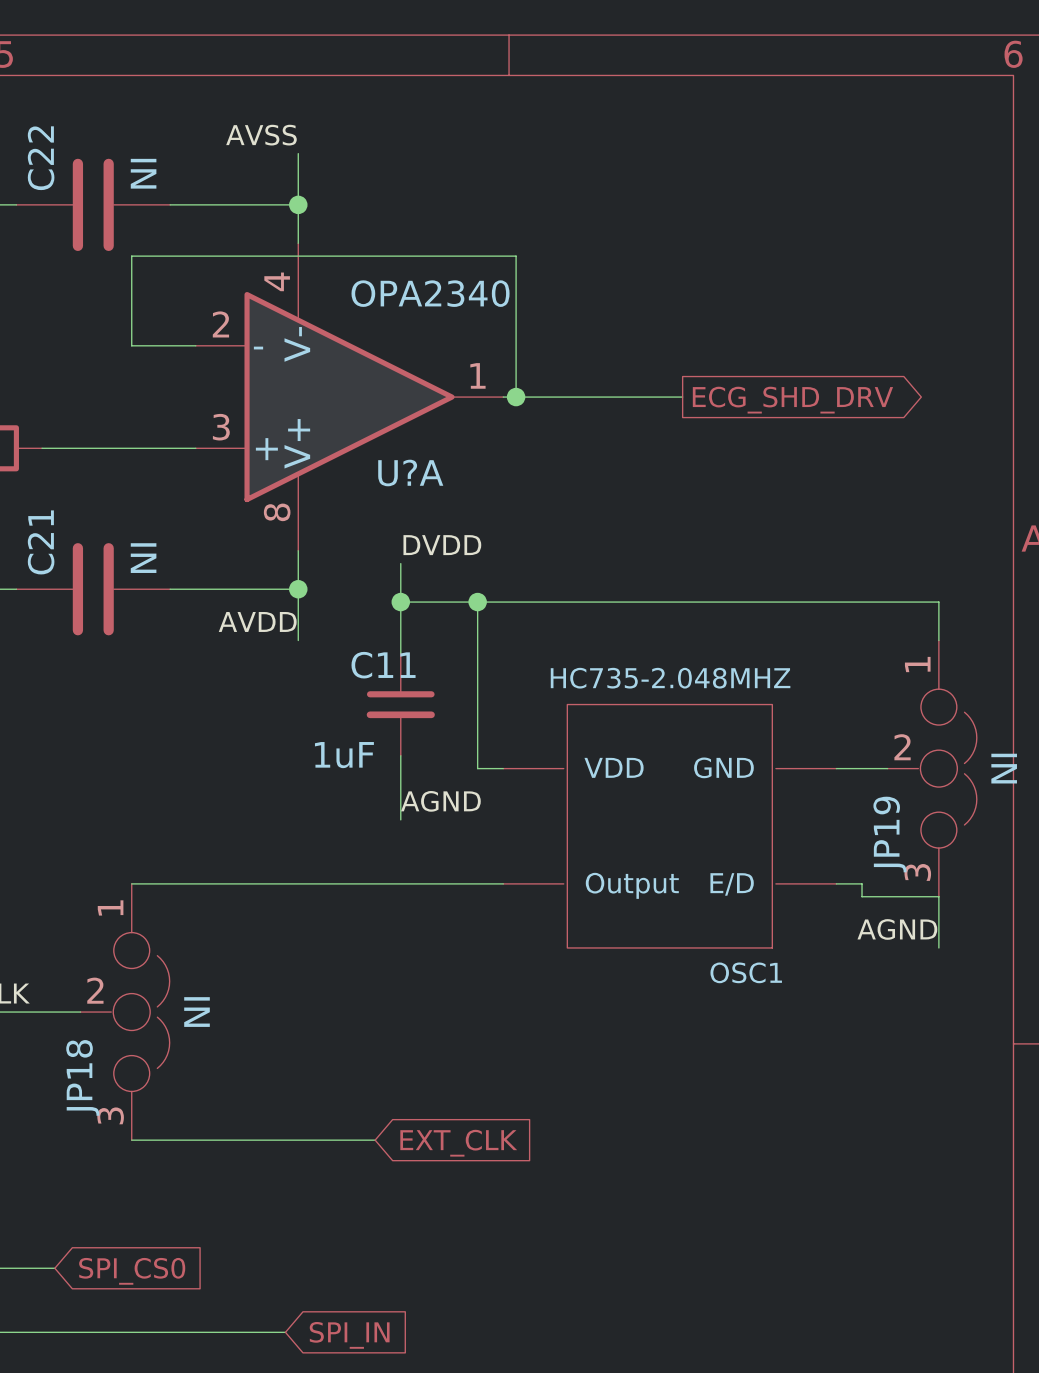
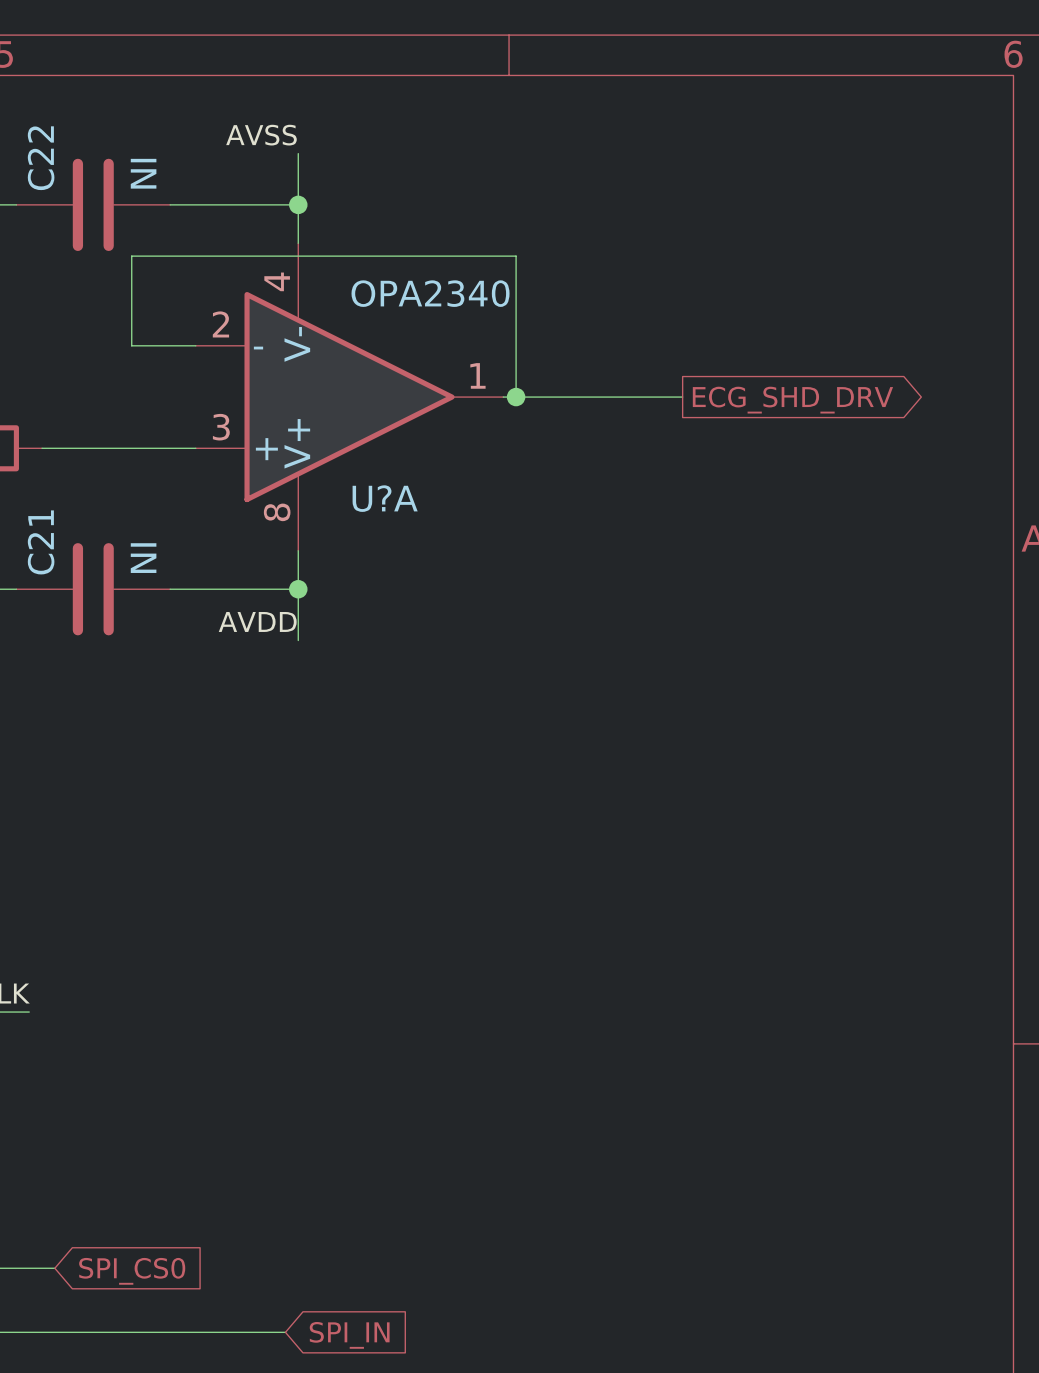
U?A name position: U?A (410, 472) -> U?A (385, 498)
label: DVDD (442, 545) -> none
wire: (400, 563) (400, 653) -> none
wire: (400, 602) (938, 602) (938, 640) -> none
junction: (400, 602) -> none
wire: (477, 602) (477, 768) (503, 768) -> none
junction: (477, 602) -> none
C11: 1uF (400, 704) -> none
wire: (400, 755) (400, 819) -> none
wire: (836, 768) (887, 768) -> none
JP19: NI (932, 768) -> none
label: AGND (440, 801) -> none
OSC1: HC735-2.048MHZ (669, 826) -> none
wire: (131, 883) (503, 883) -> none
wire: (836, 883) (862, 883) (862, 896) (938, 896) (938, 947) -> none
label: AGND (897, 929) -> none
wire: (29, 1012) (80, 1012) -> none
JP18: NI (125, 1012) -> none
wire: (131, 1140) (375, 1140) -> none
global label: EXT_CLK (458, 1143) -> none

